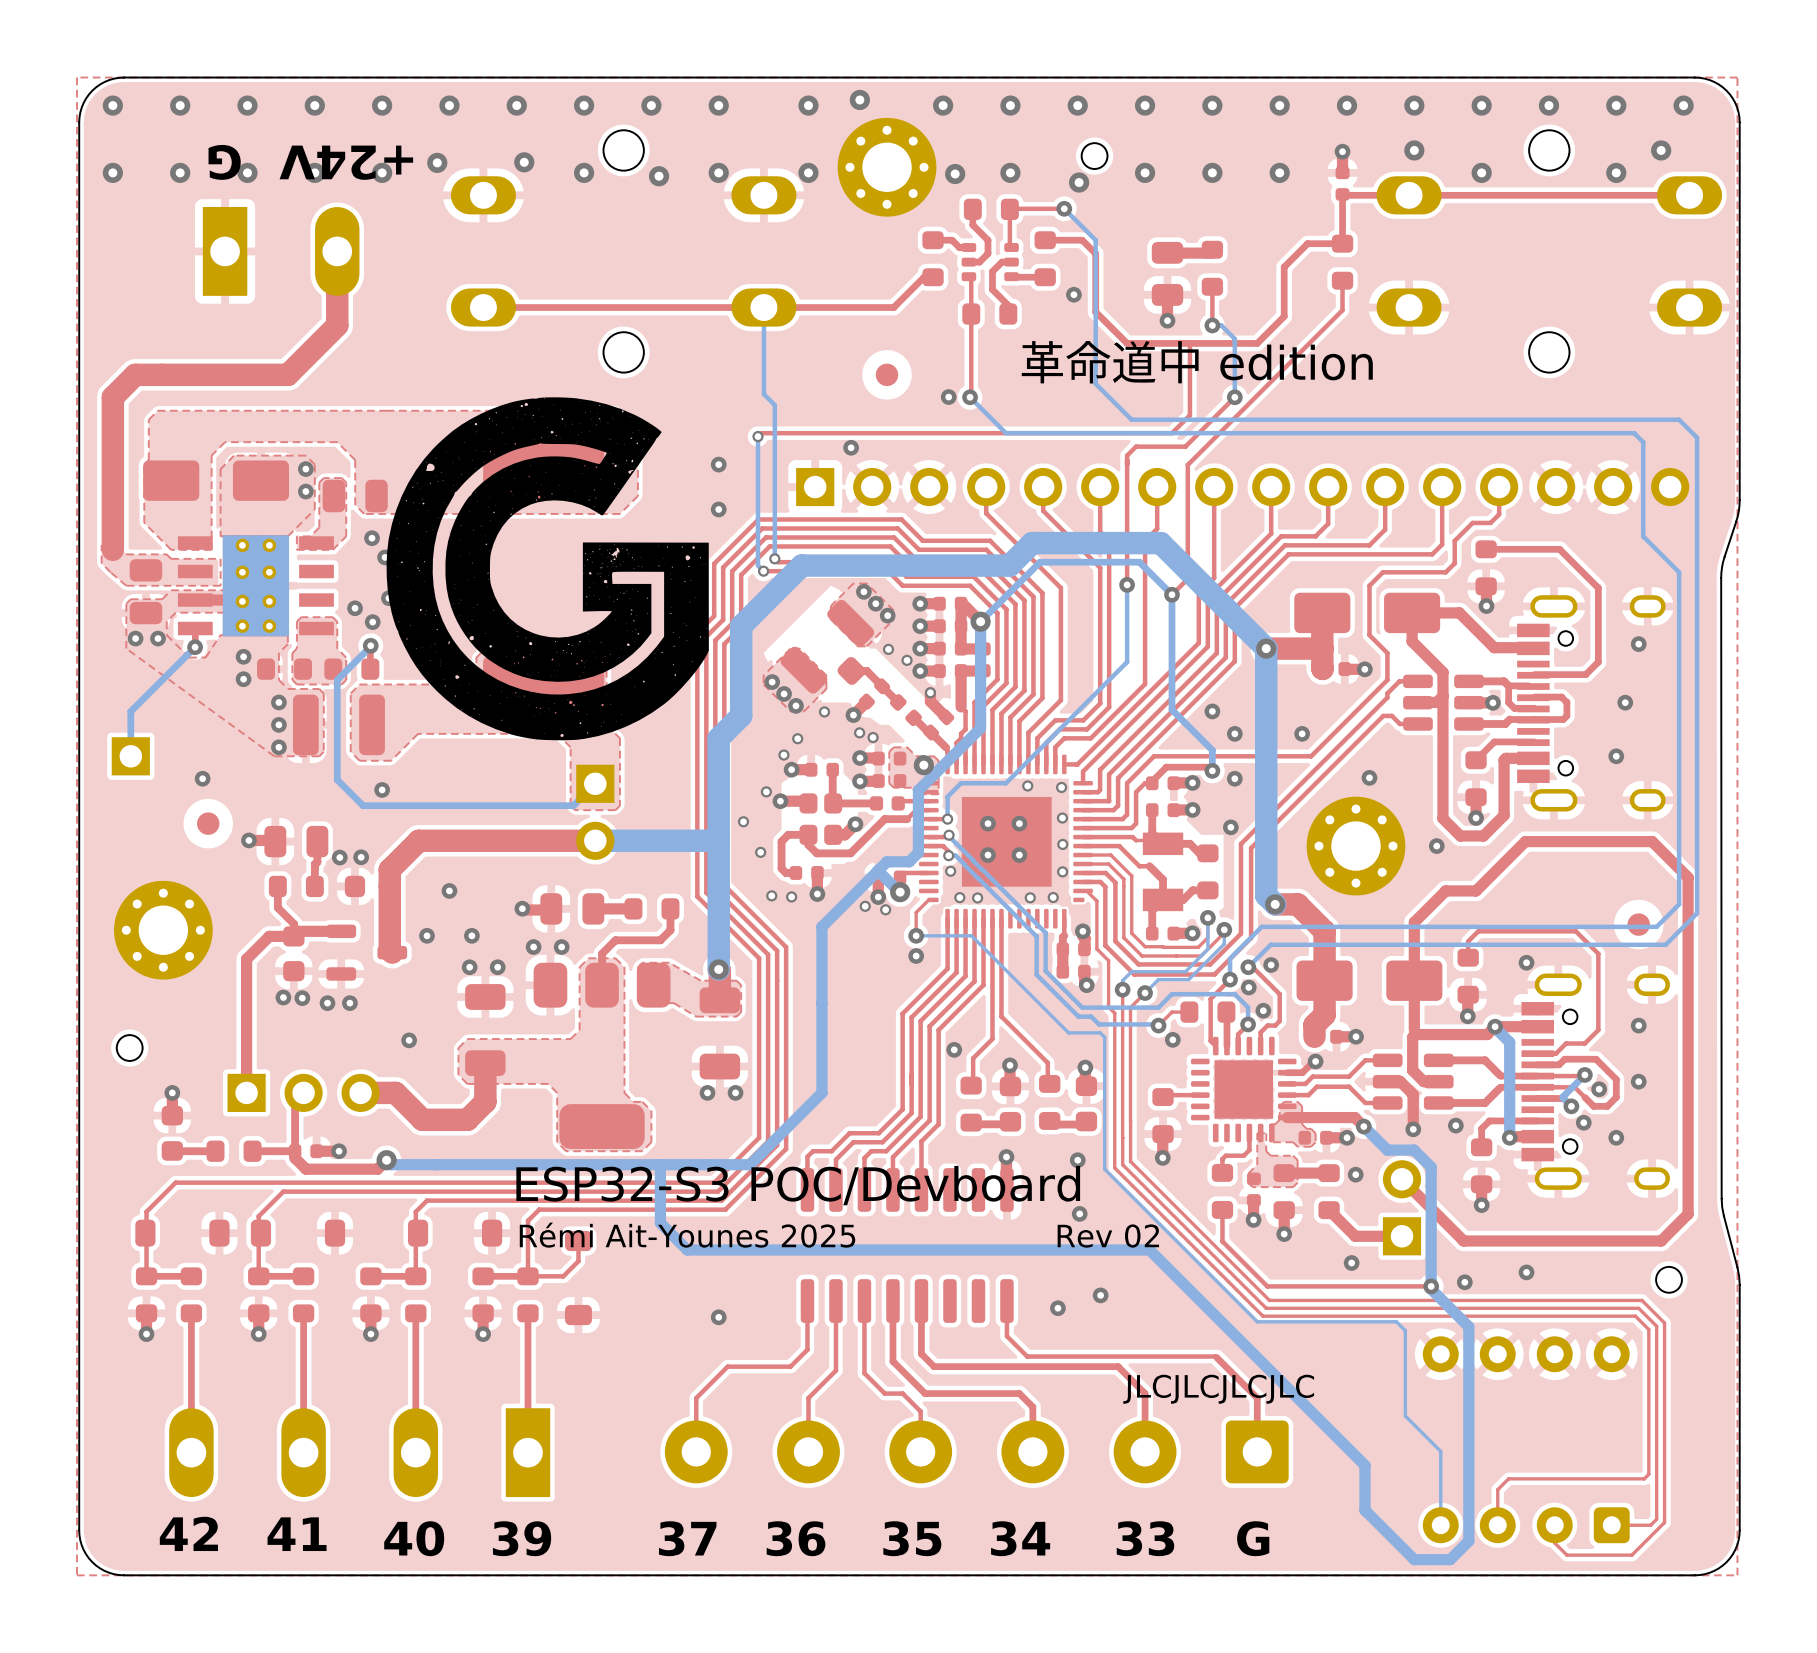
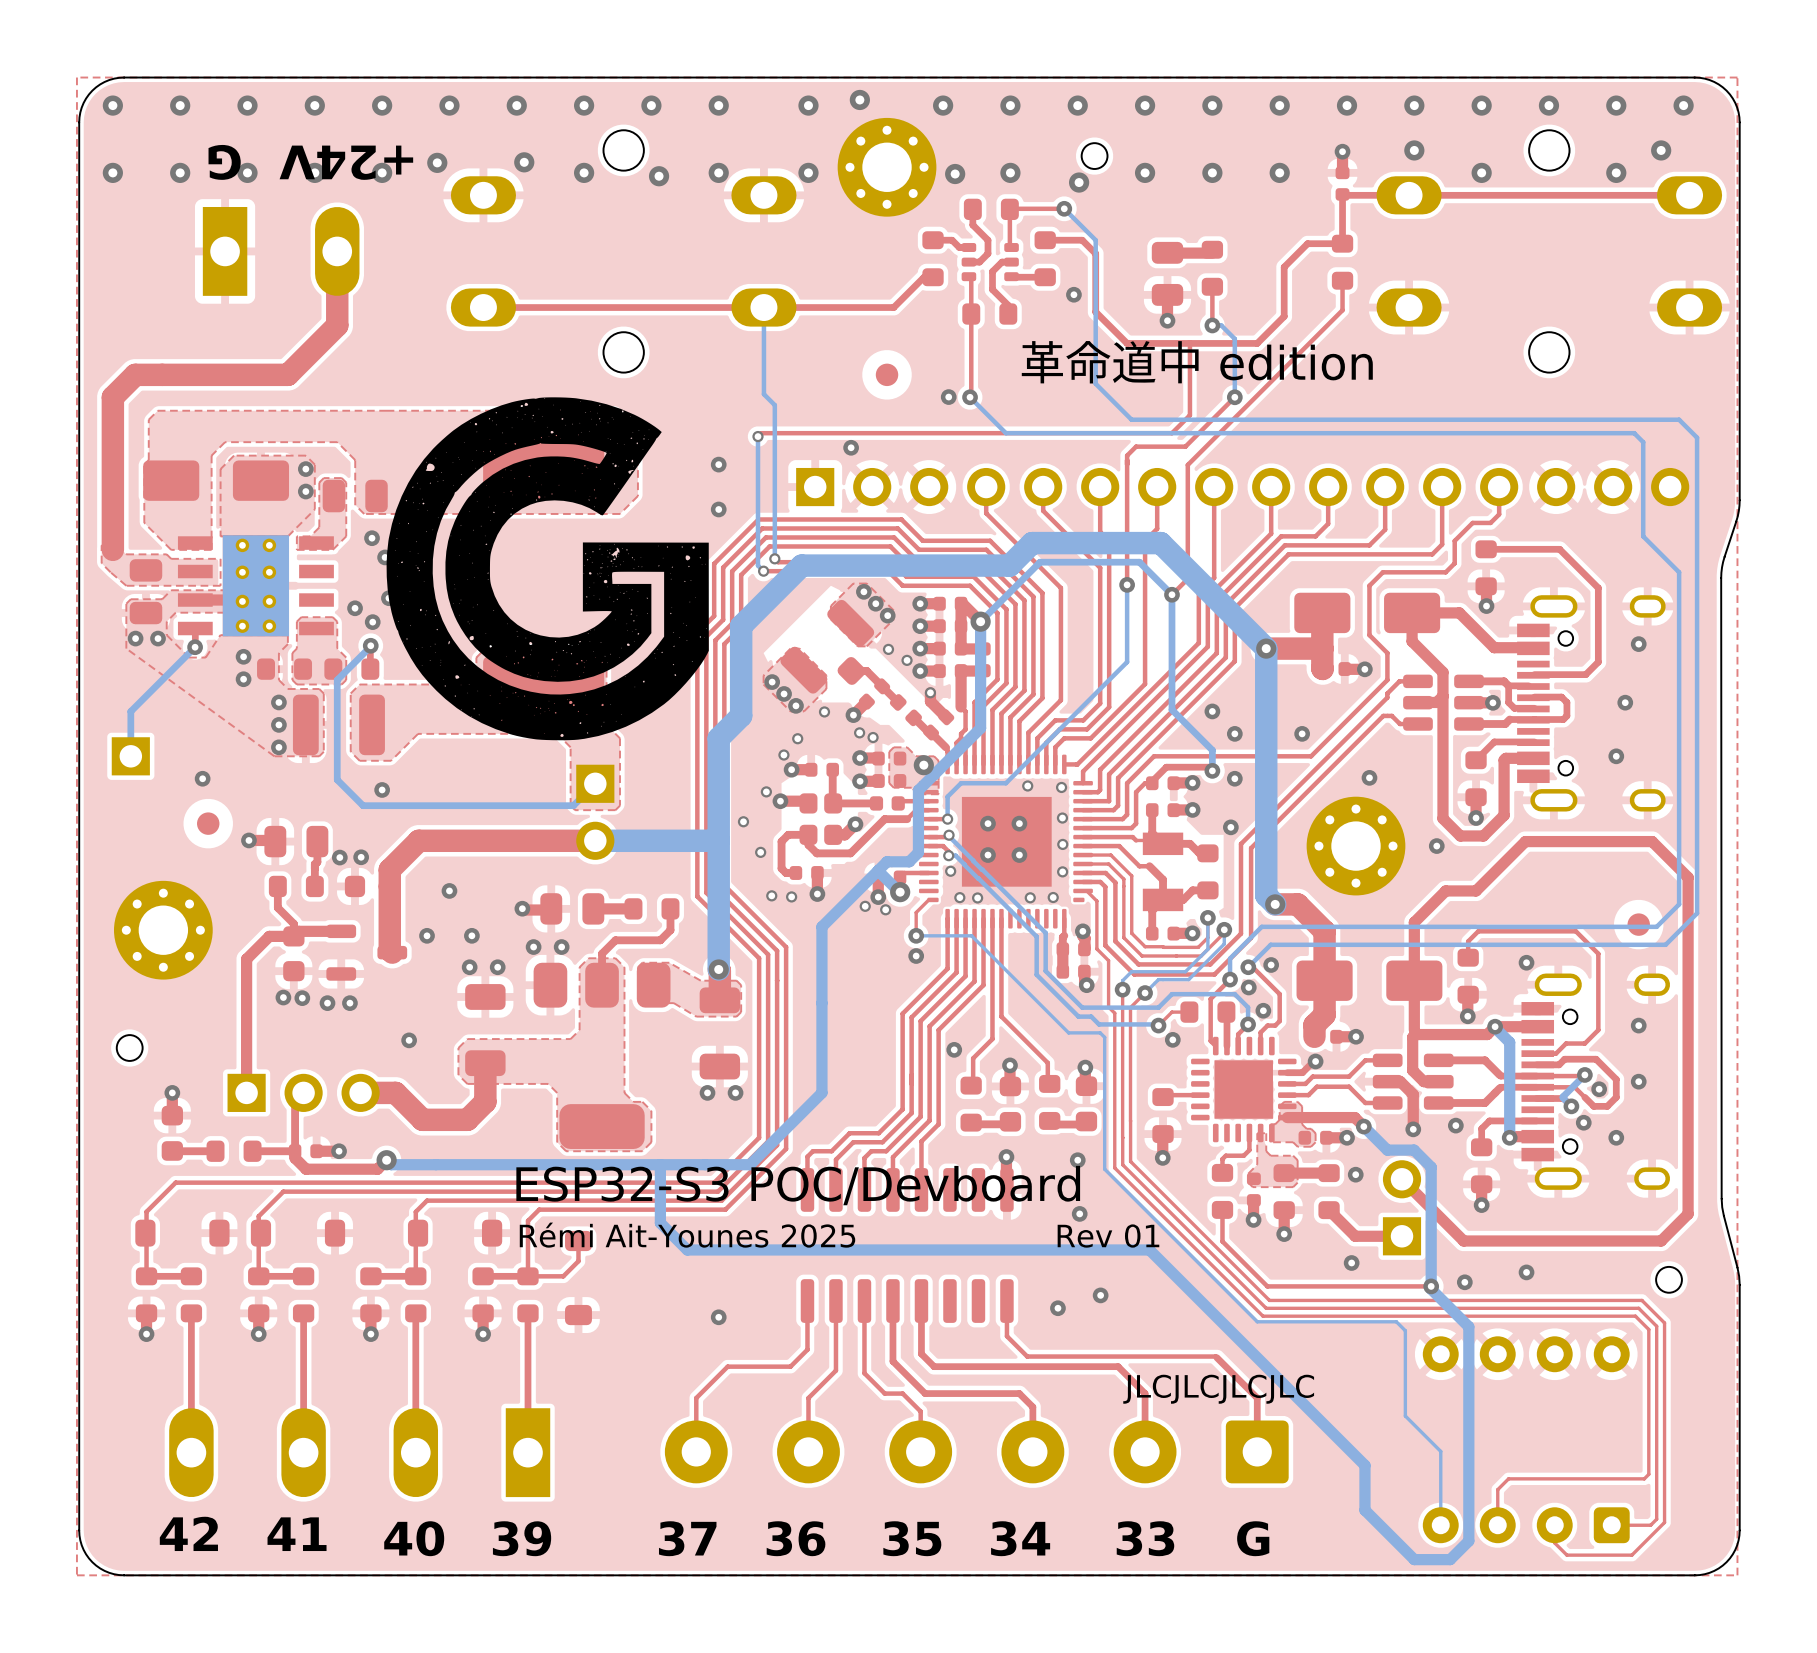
text: Rev 02 (1108, 1236) -> Rev 01 (1108, 1236)

